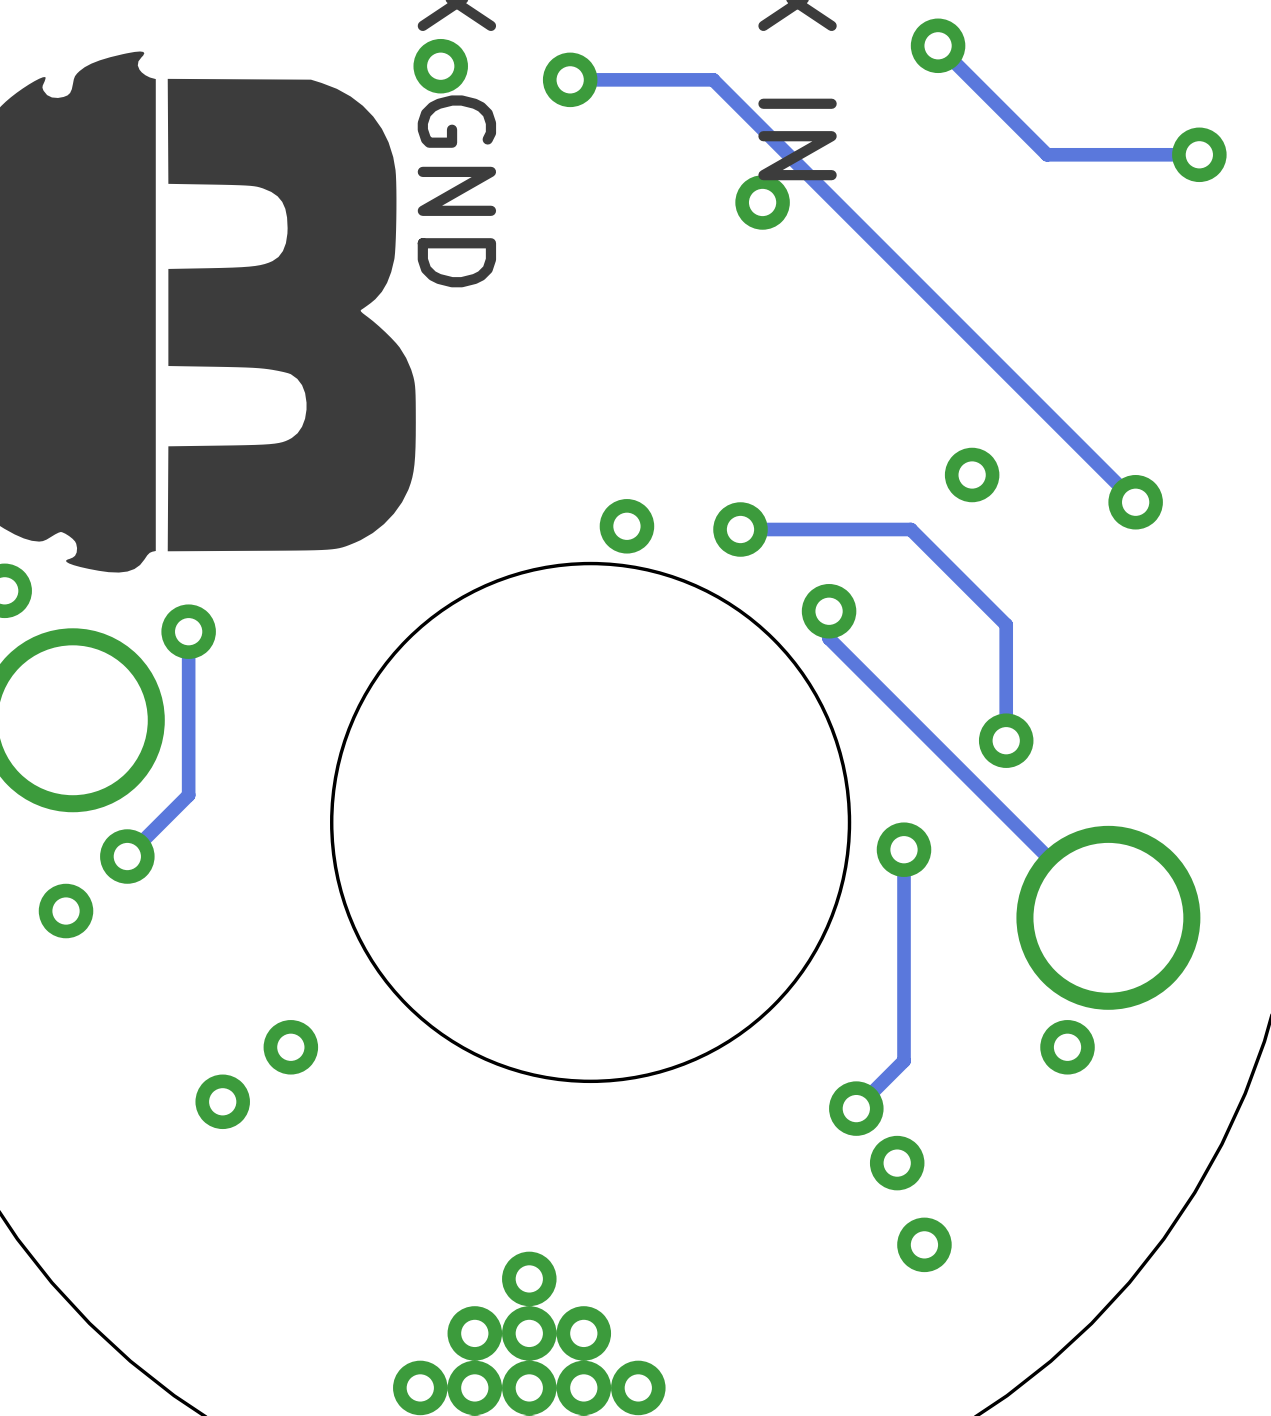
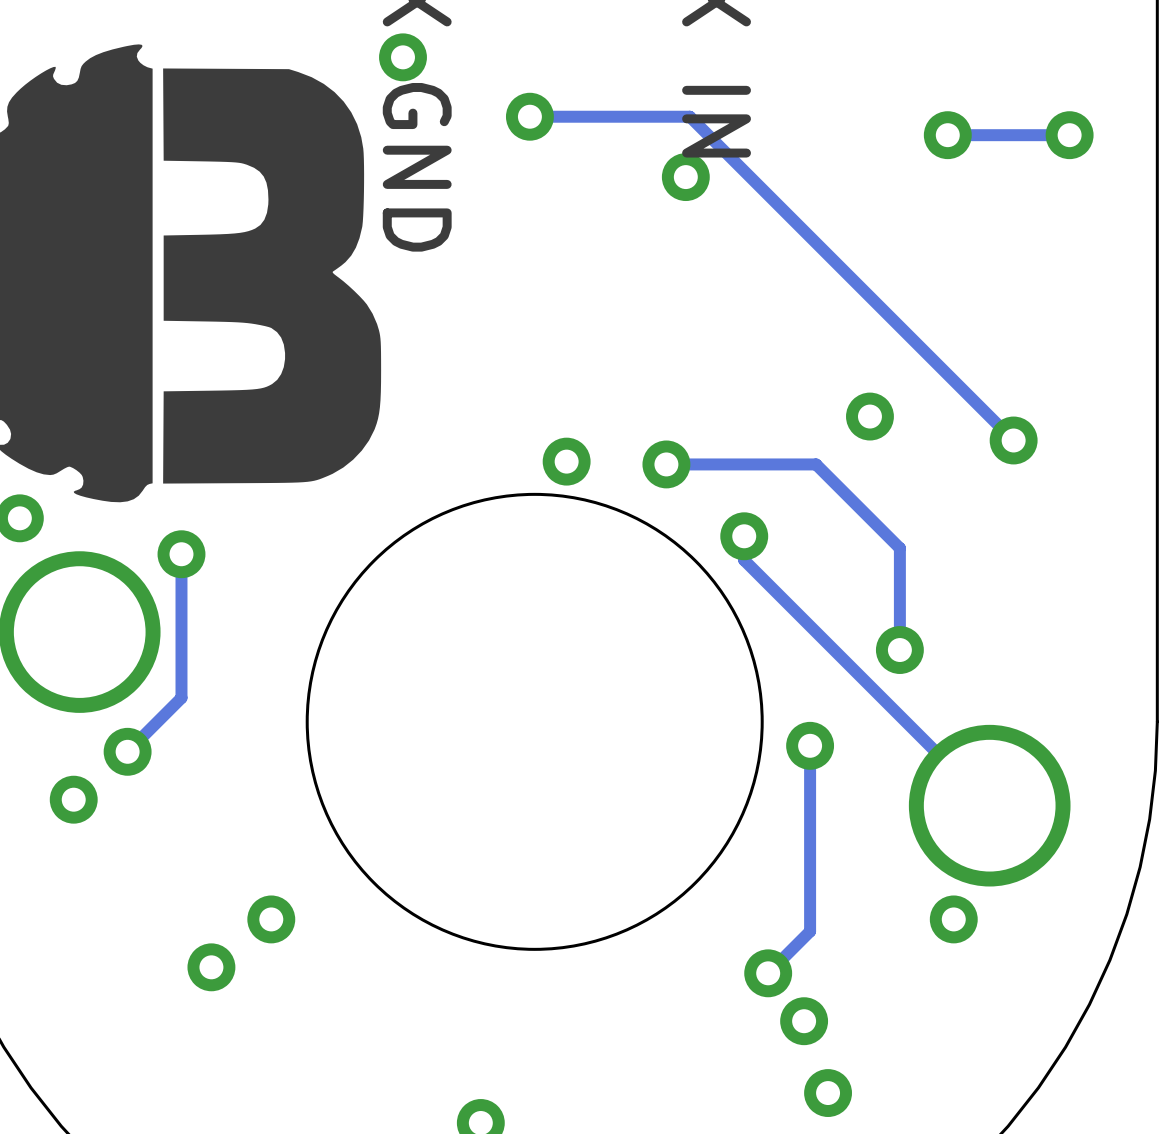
track: (938, 45) (1047, 154) (1060, 154) -> none
via: (938, 45) -> none
track: (570, 79) (713, 79) (767, 133) -> (529, 116) (689, 116)
via position: (570, 79) -> (529, 116)
via: none -> (947, 135)

